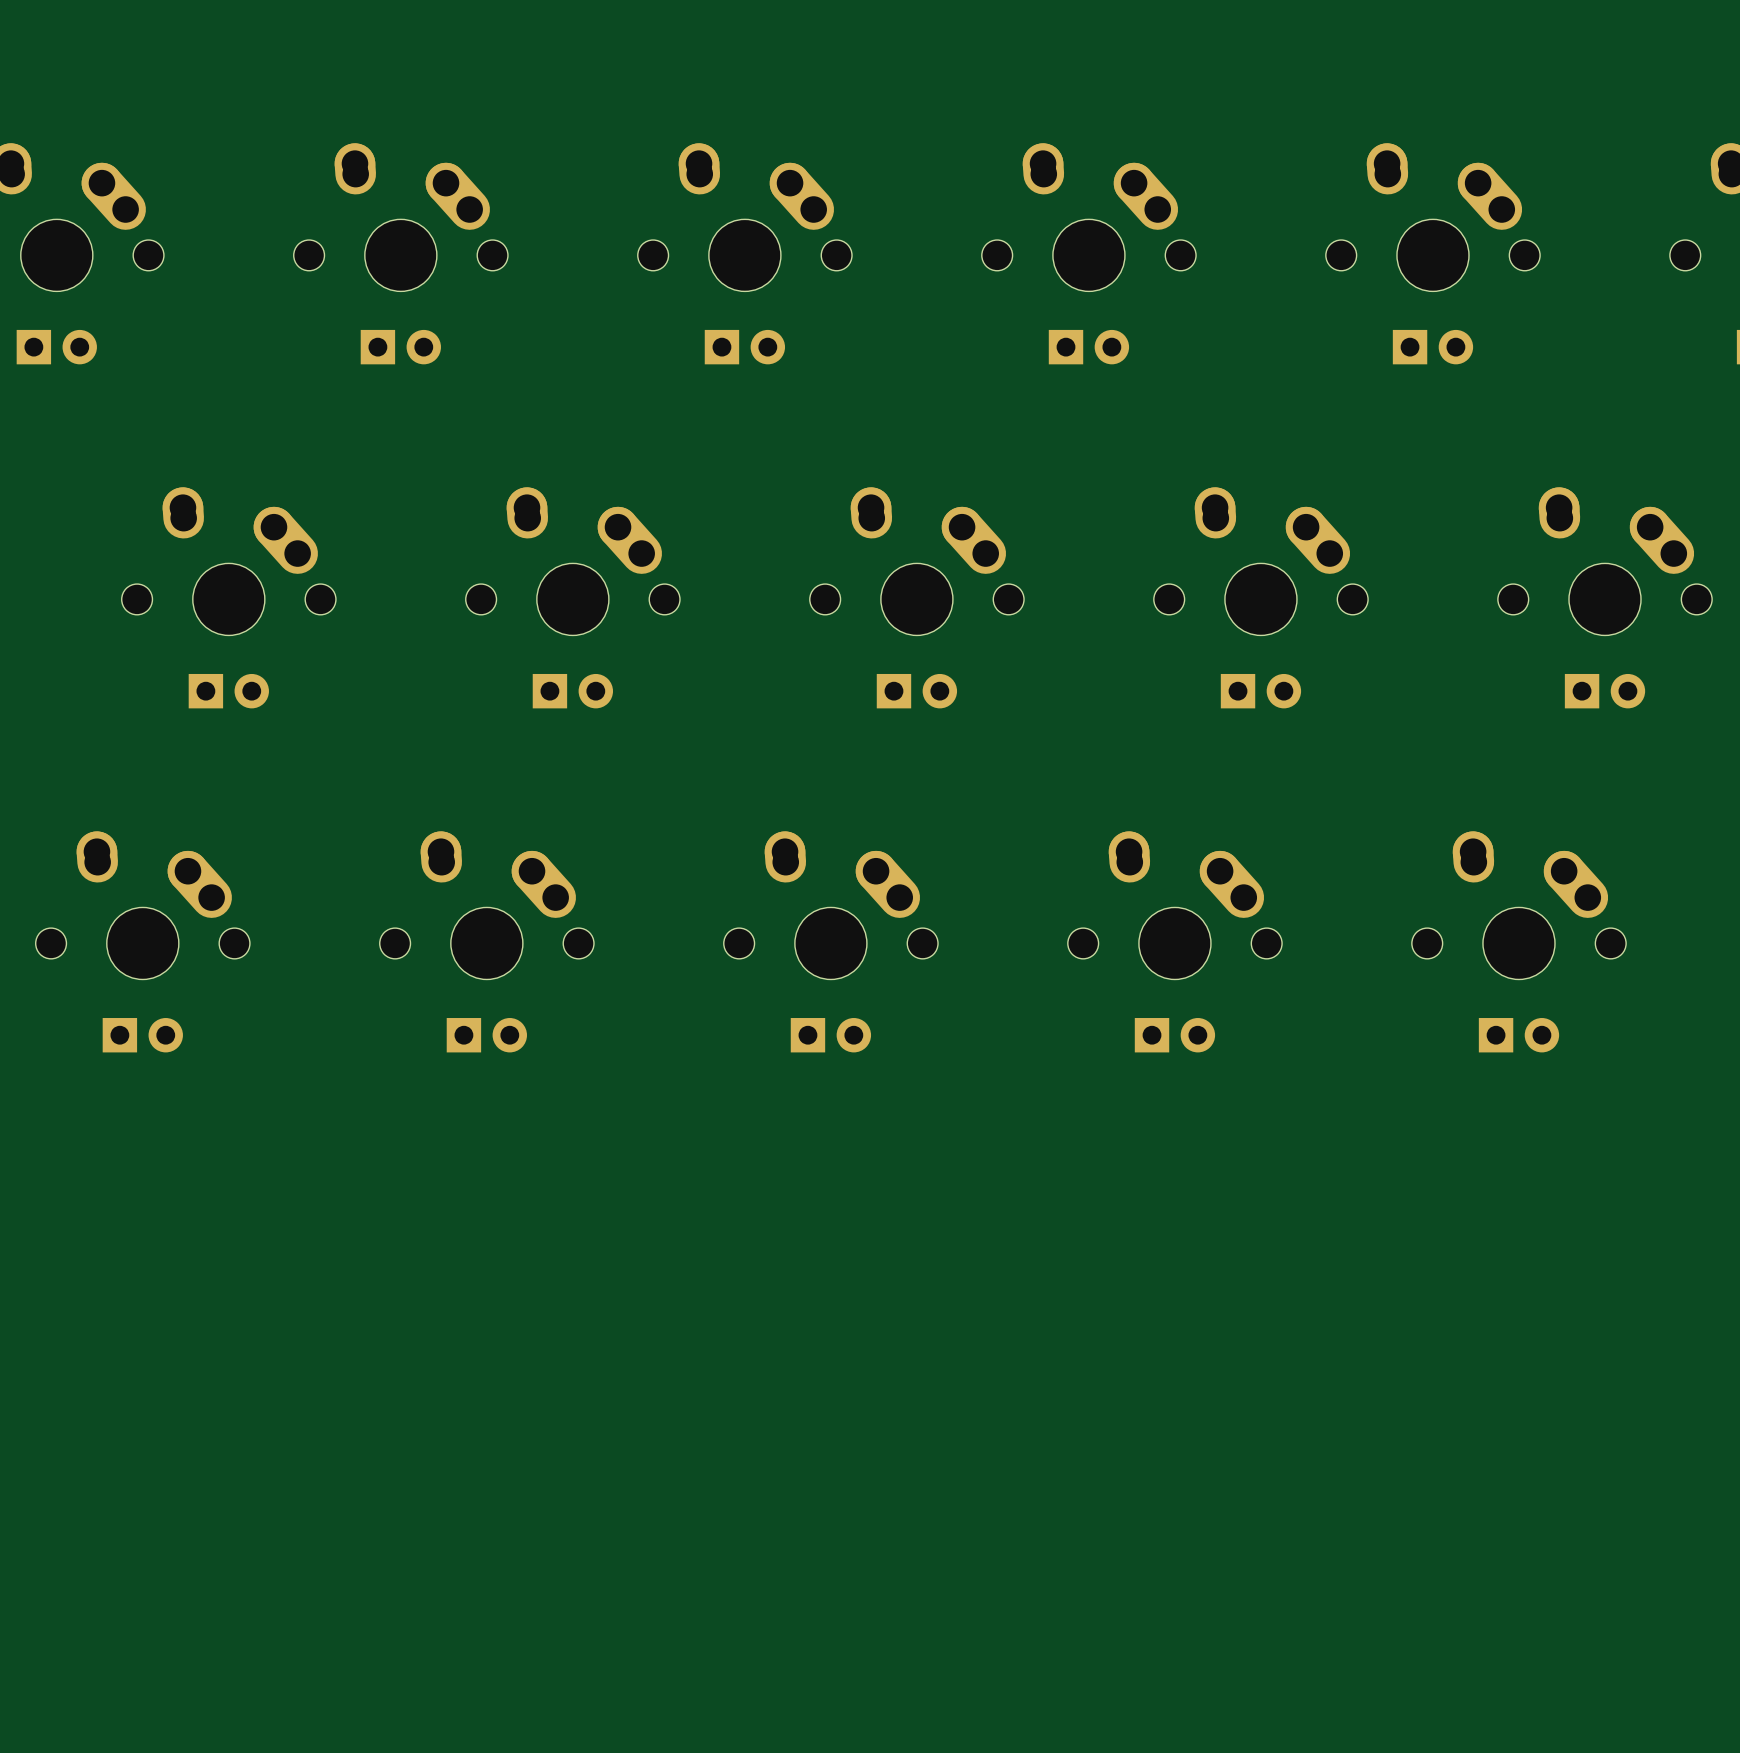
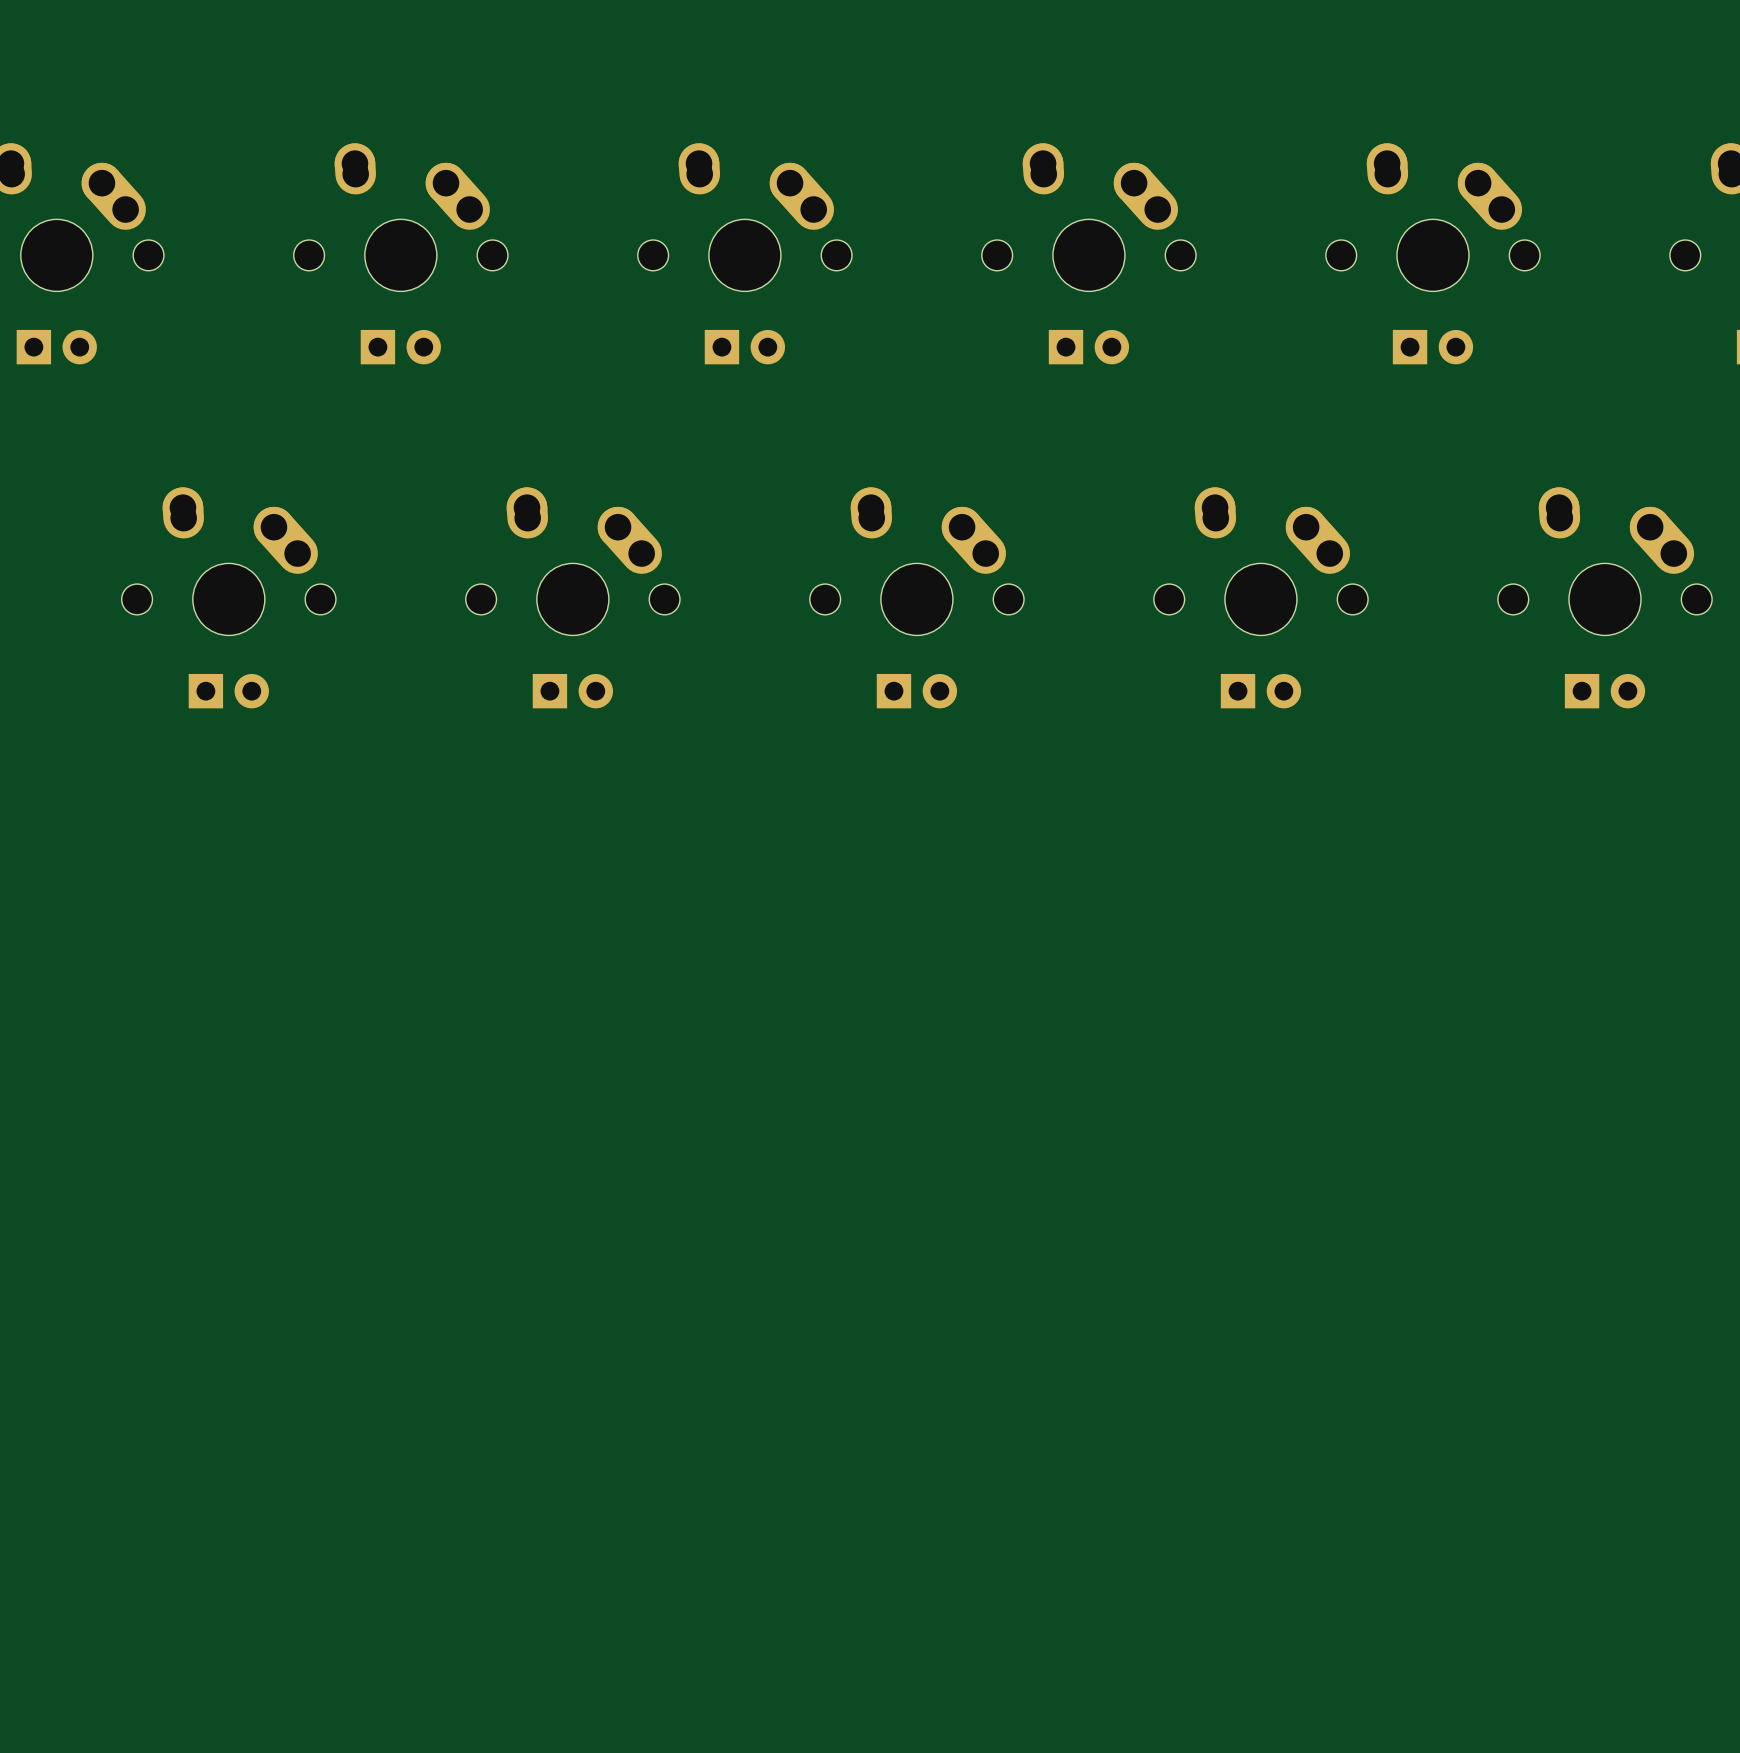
part: (142, 941) -> none
part: (486, 941) -> none
part: (830, 941) -> none
part: (1174, 941) -> none
part: (1518, 941) -> none

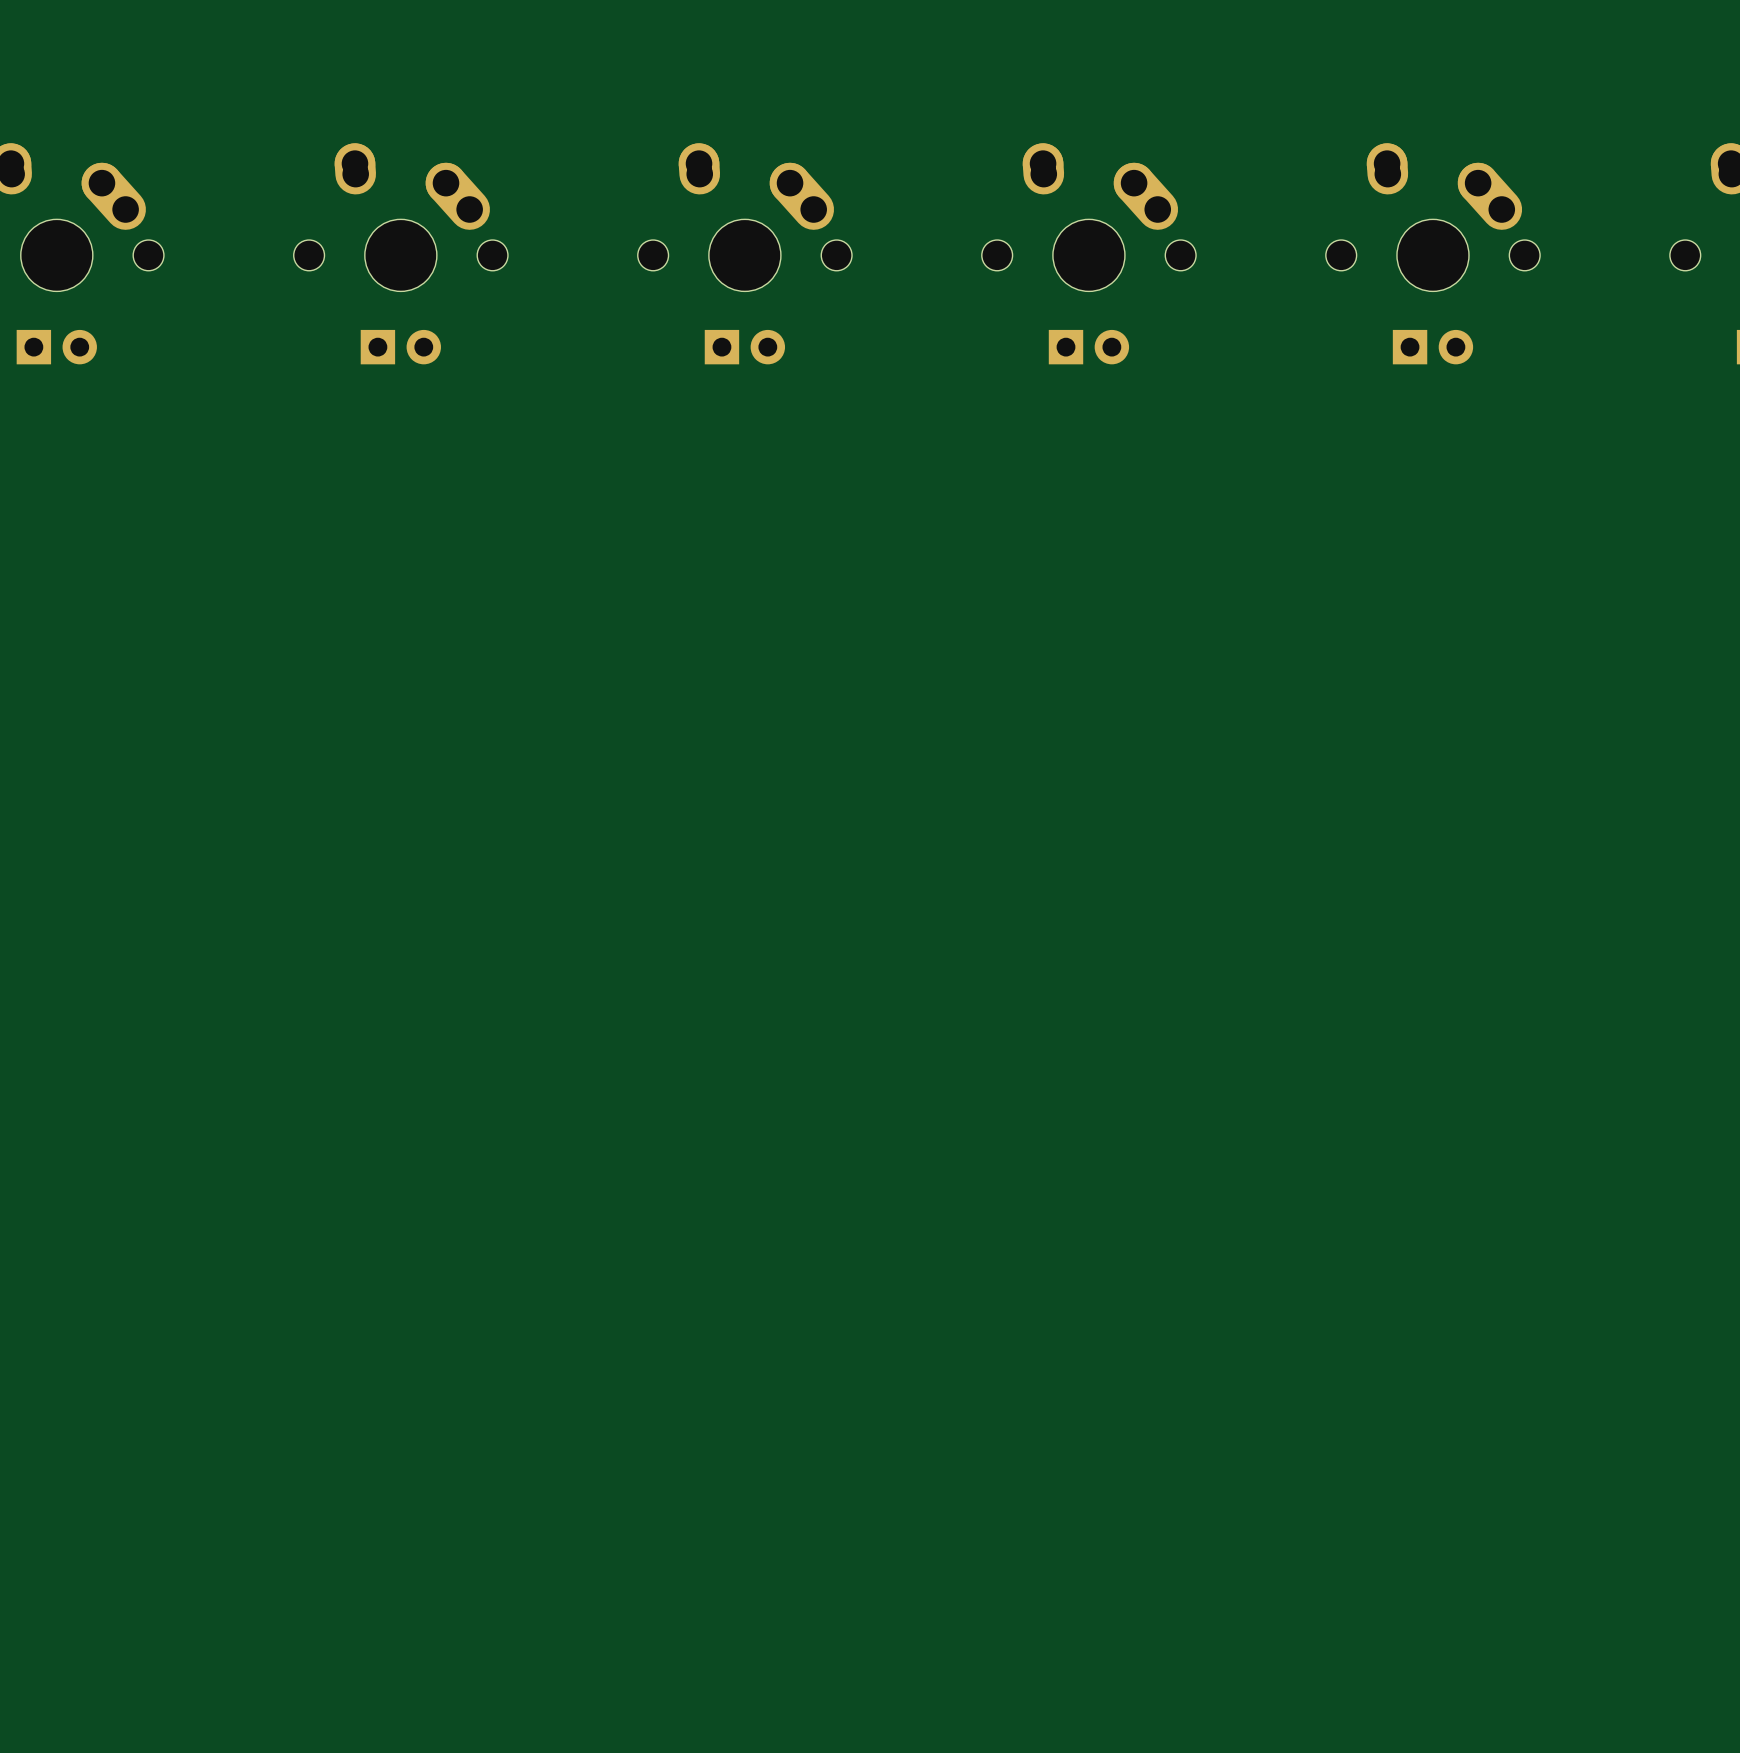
part: (228, 597) -> none
part: (572, 597) -> none
part: (916, 597) -> none
part: (1260, 597) -> none
part: (1605, 597) -> none

